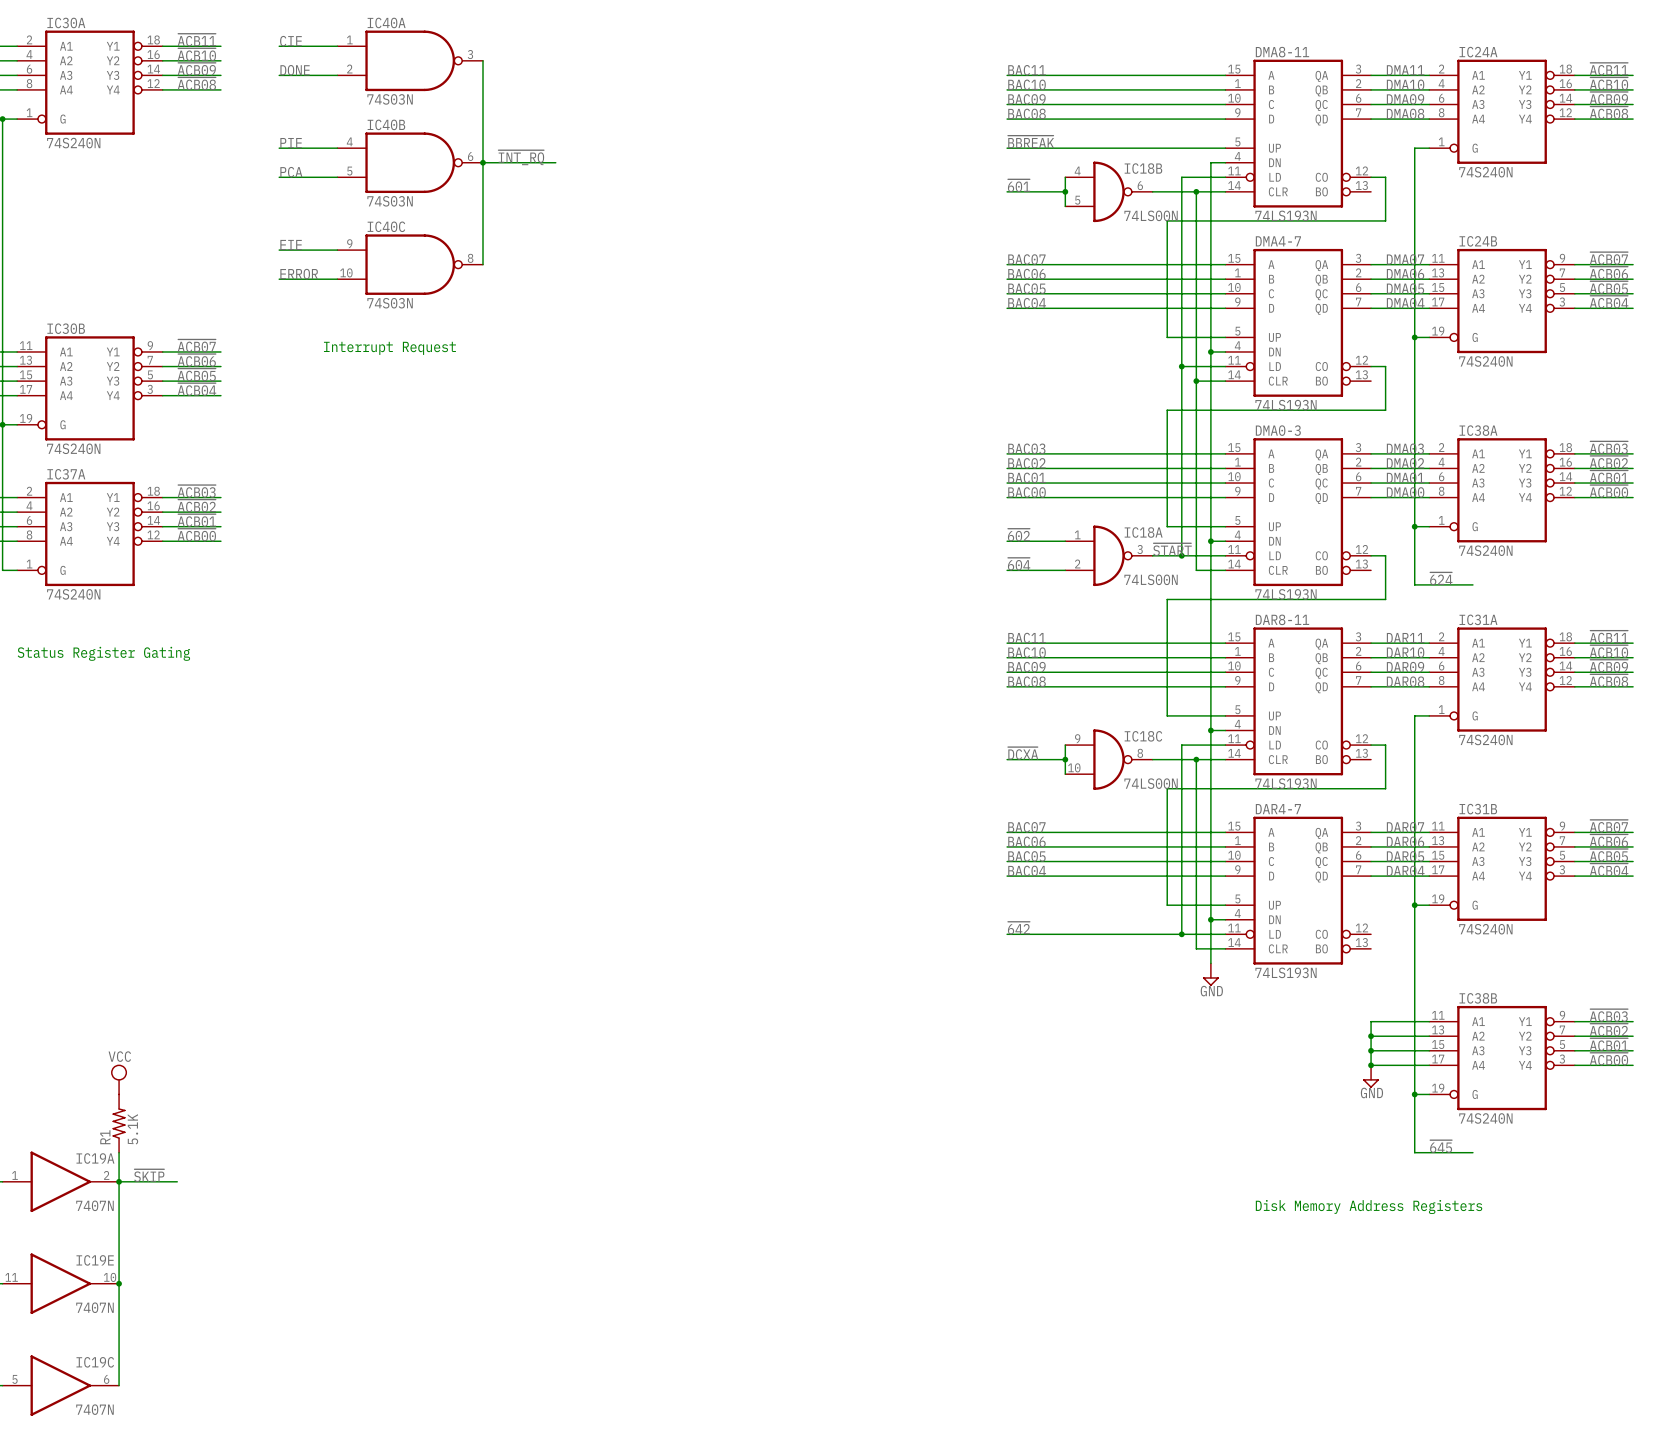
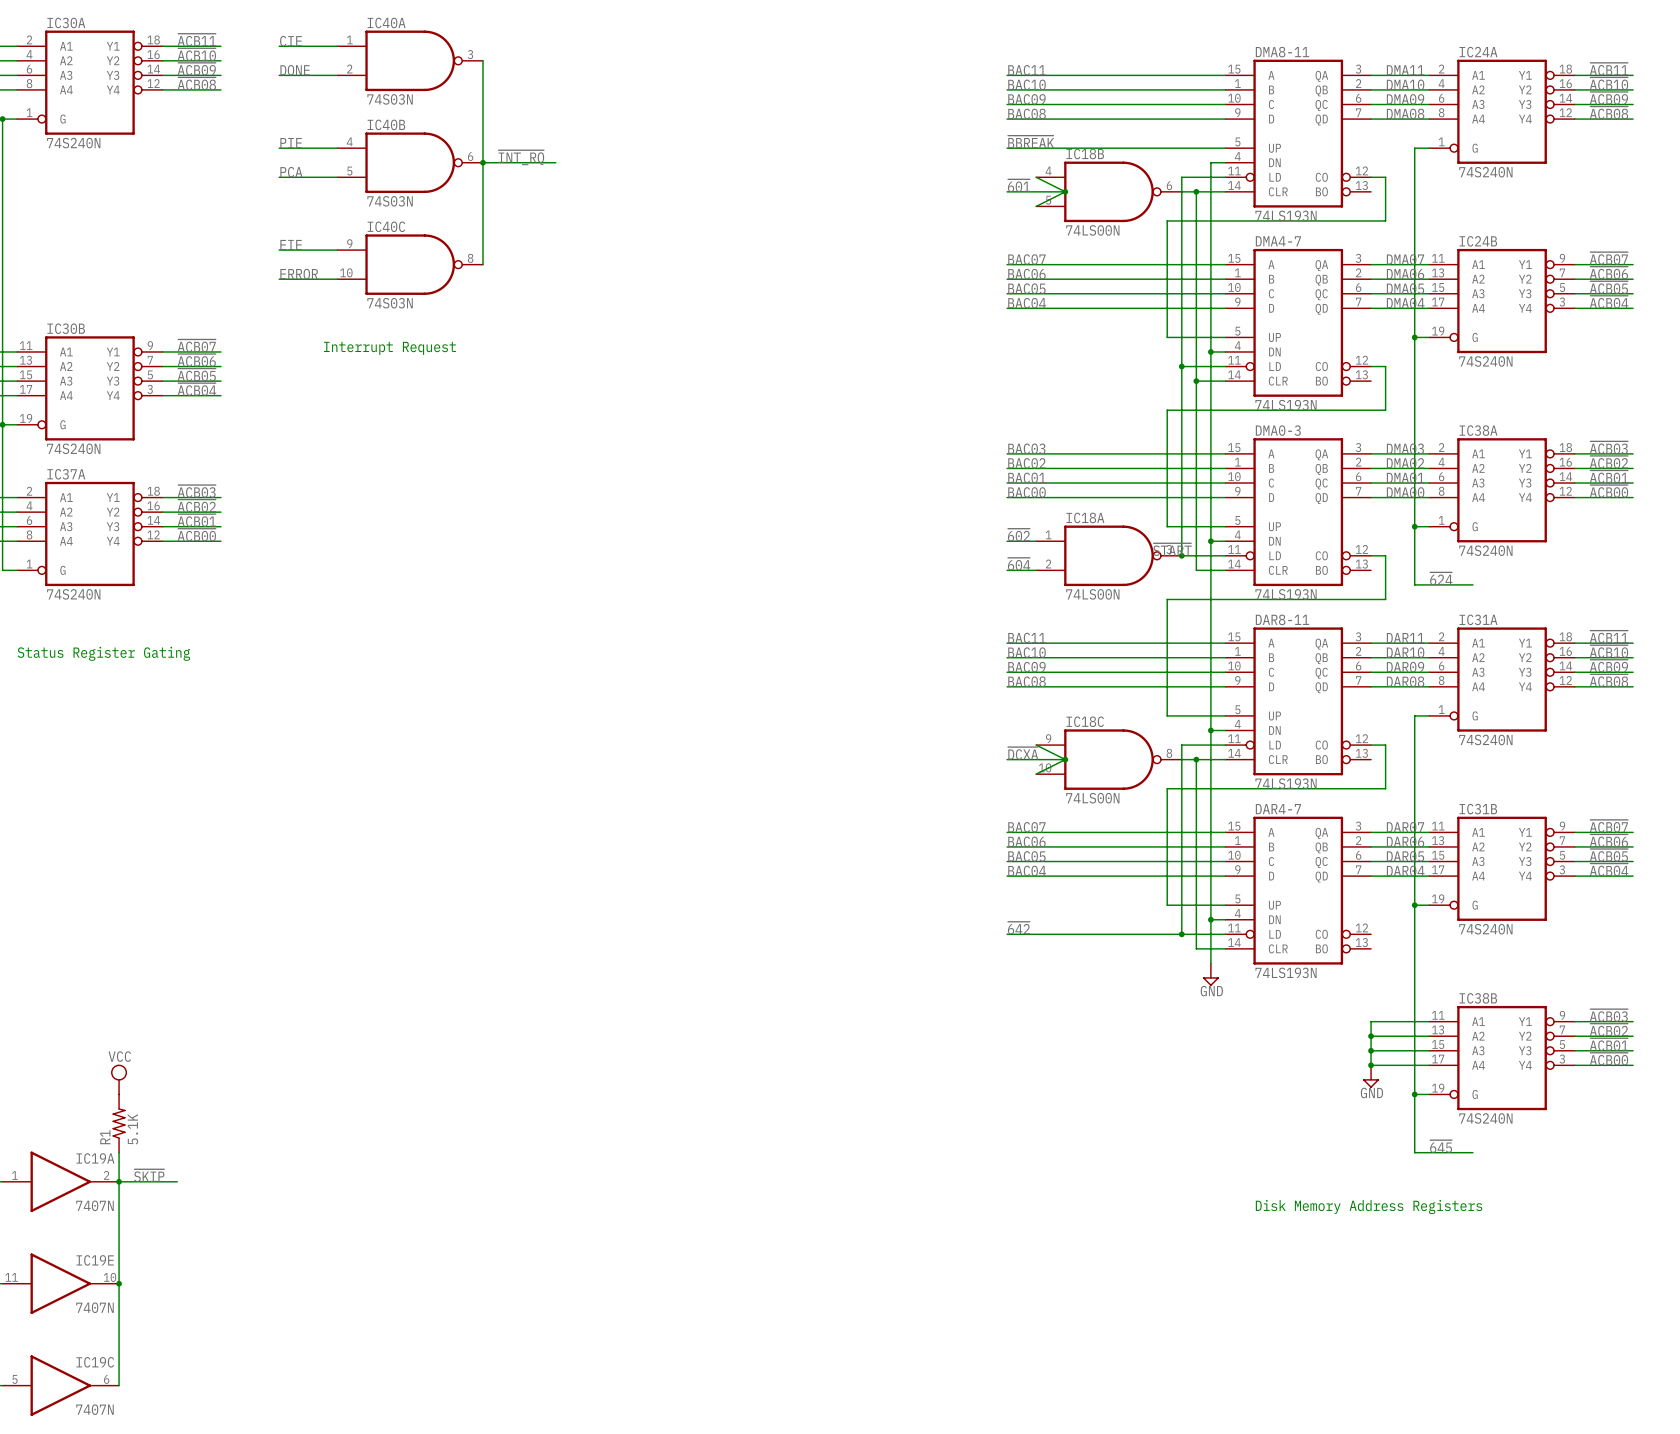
IC18B symbol: [1065, 161, 1153, 223] -> [1036, 161, 1182, 223]
IC18B name position: IC18B (1143, 168) -> IC18B (1085, 154)
wire: none -> (1036, 177) (1065, 191) (1036, 206)
IC18B value position: 74LS00N (1151, 215) -> 74LS00N (1092, 230)
IC18A symbol: [1065, 525, 1153, 587] -> [1036, 525, 1182, 587]
IC18A name position: IC18A (1143, 532) -> IC18A (1085, 517)
IC18A value position: 74LS00N (1151, 579) -> 74LS00N (1092, 594)
IC18C symbol: [1065, 729, 1153, 790] -> [1036, 729, 1182, 790]
IC18C name position: IC18C (1143, 736) -> IC18C (1085, 721)
wire: none -> (1036, 745) (1065, 759) (1036, 774)
IC18C value position: 74LS00N (1151, 783) -> 74LS00N (1092, 798)

